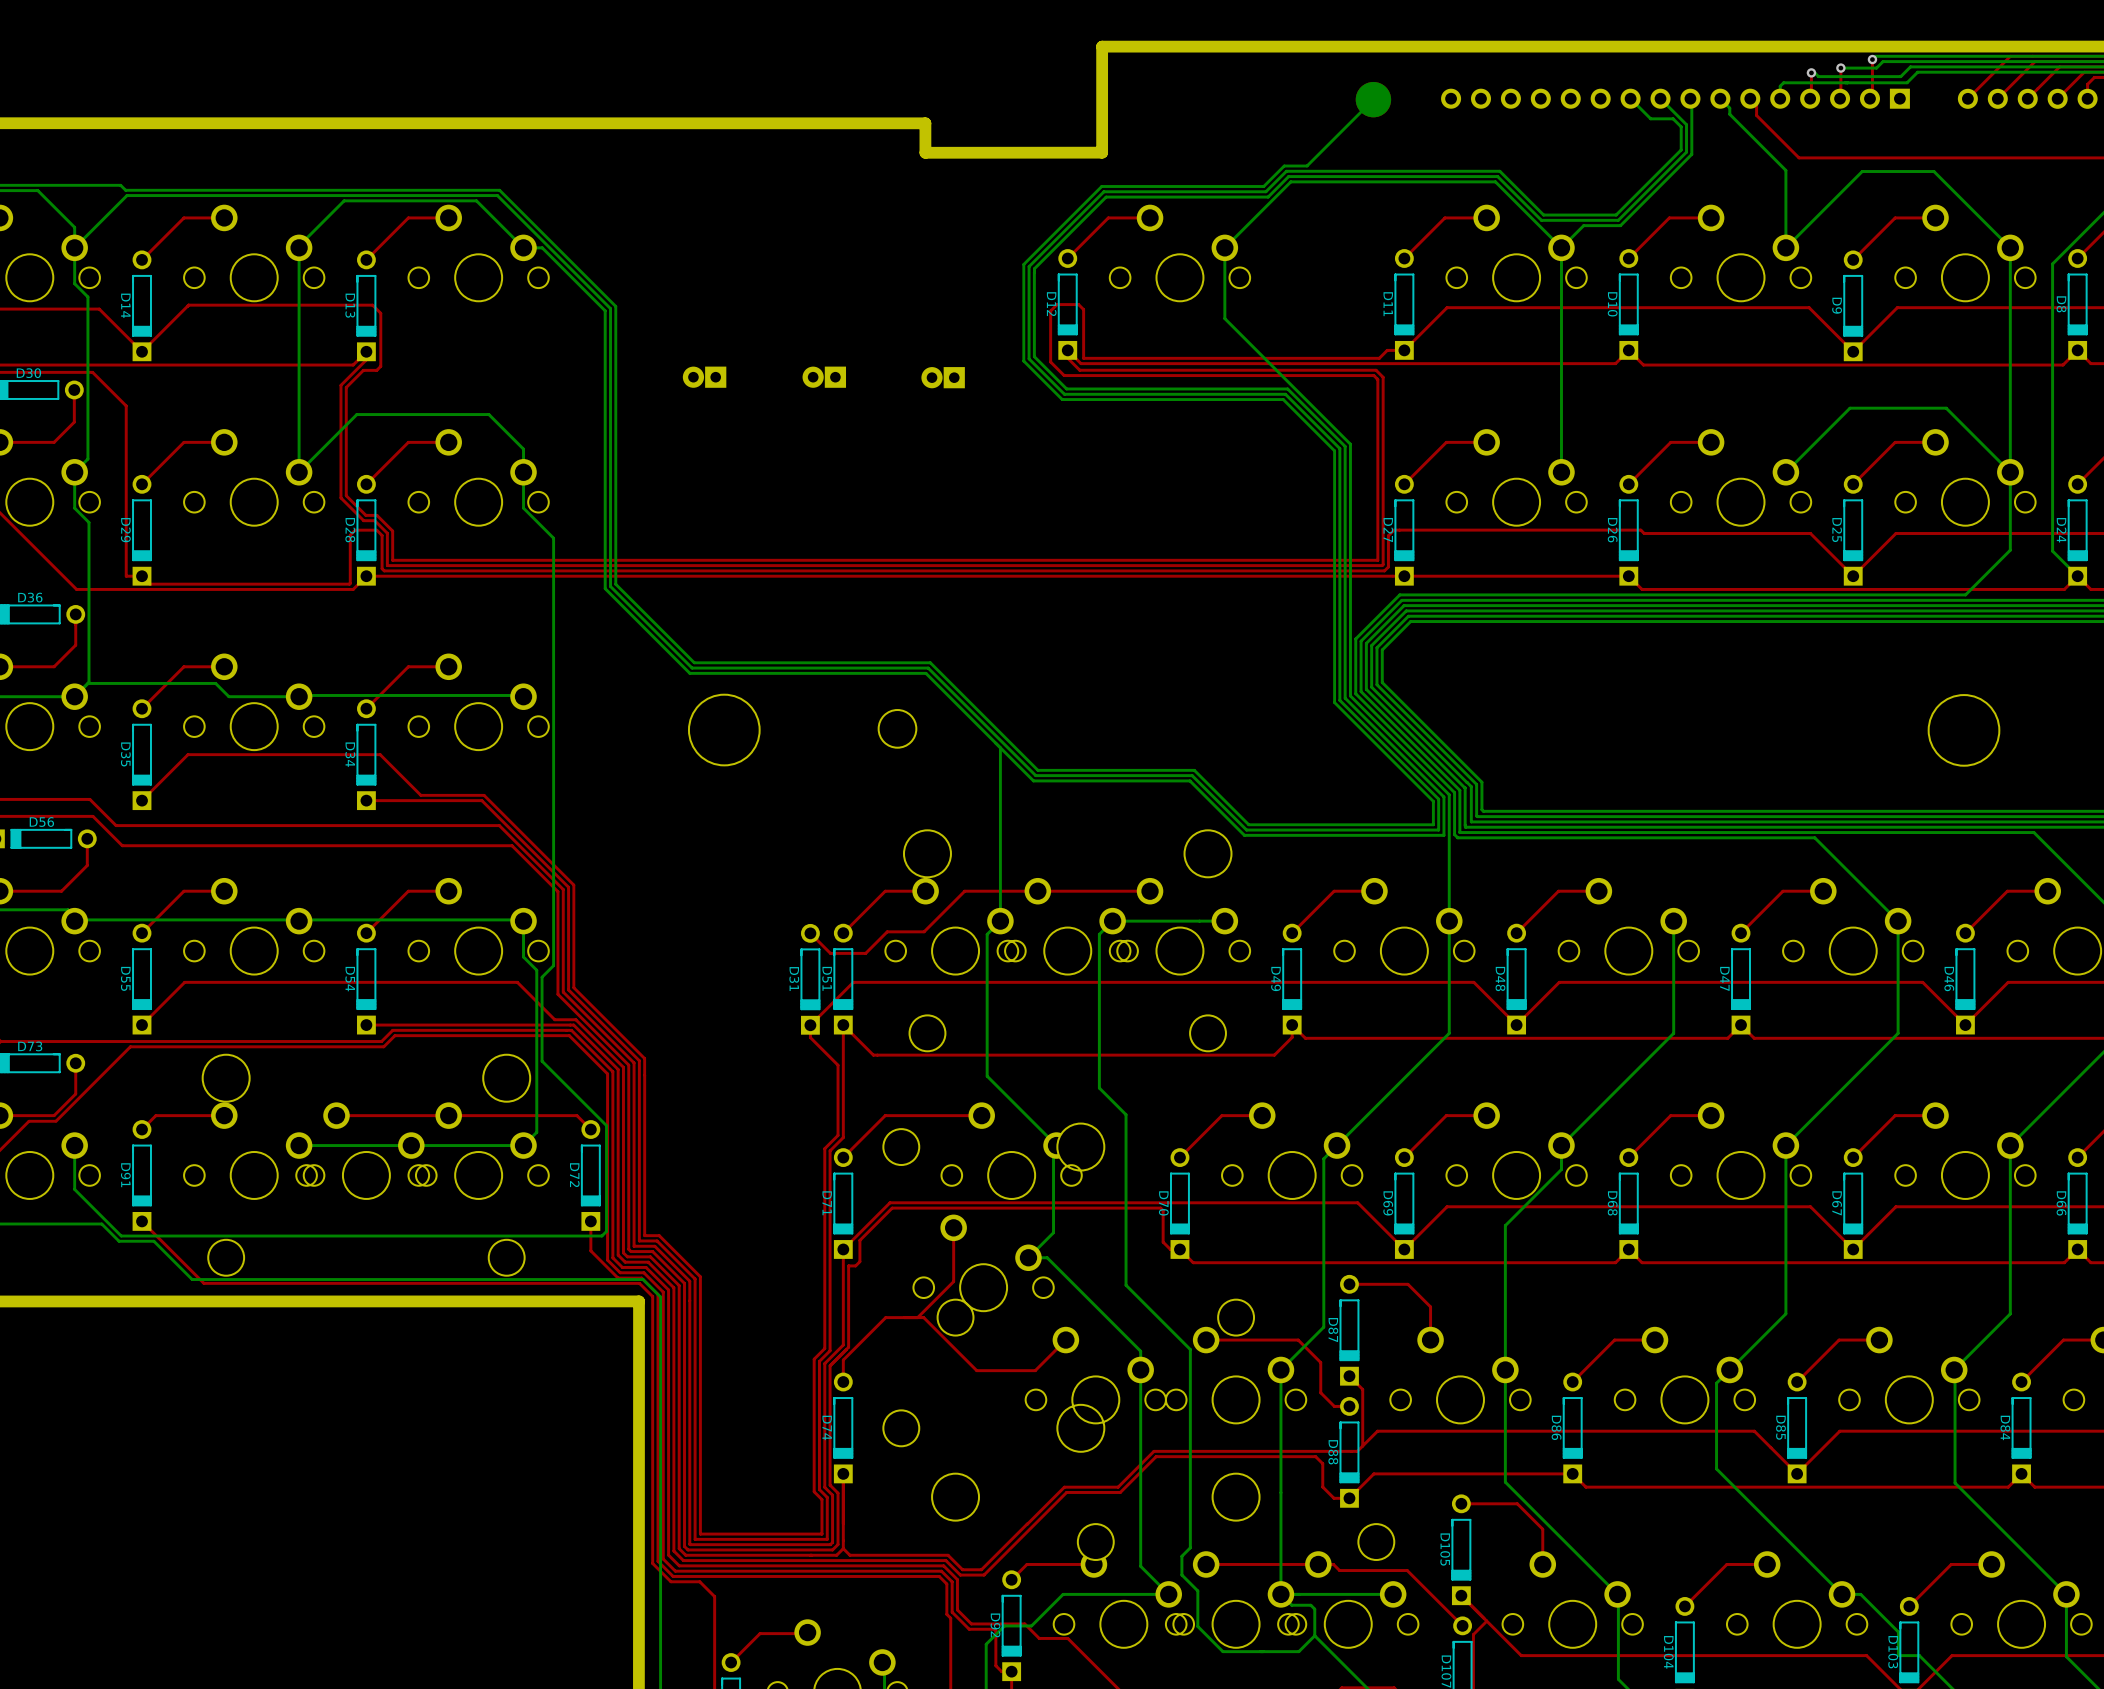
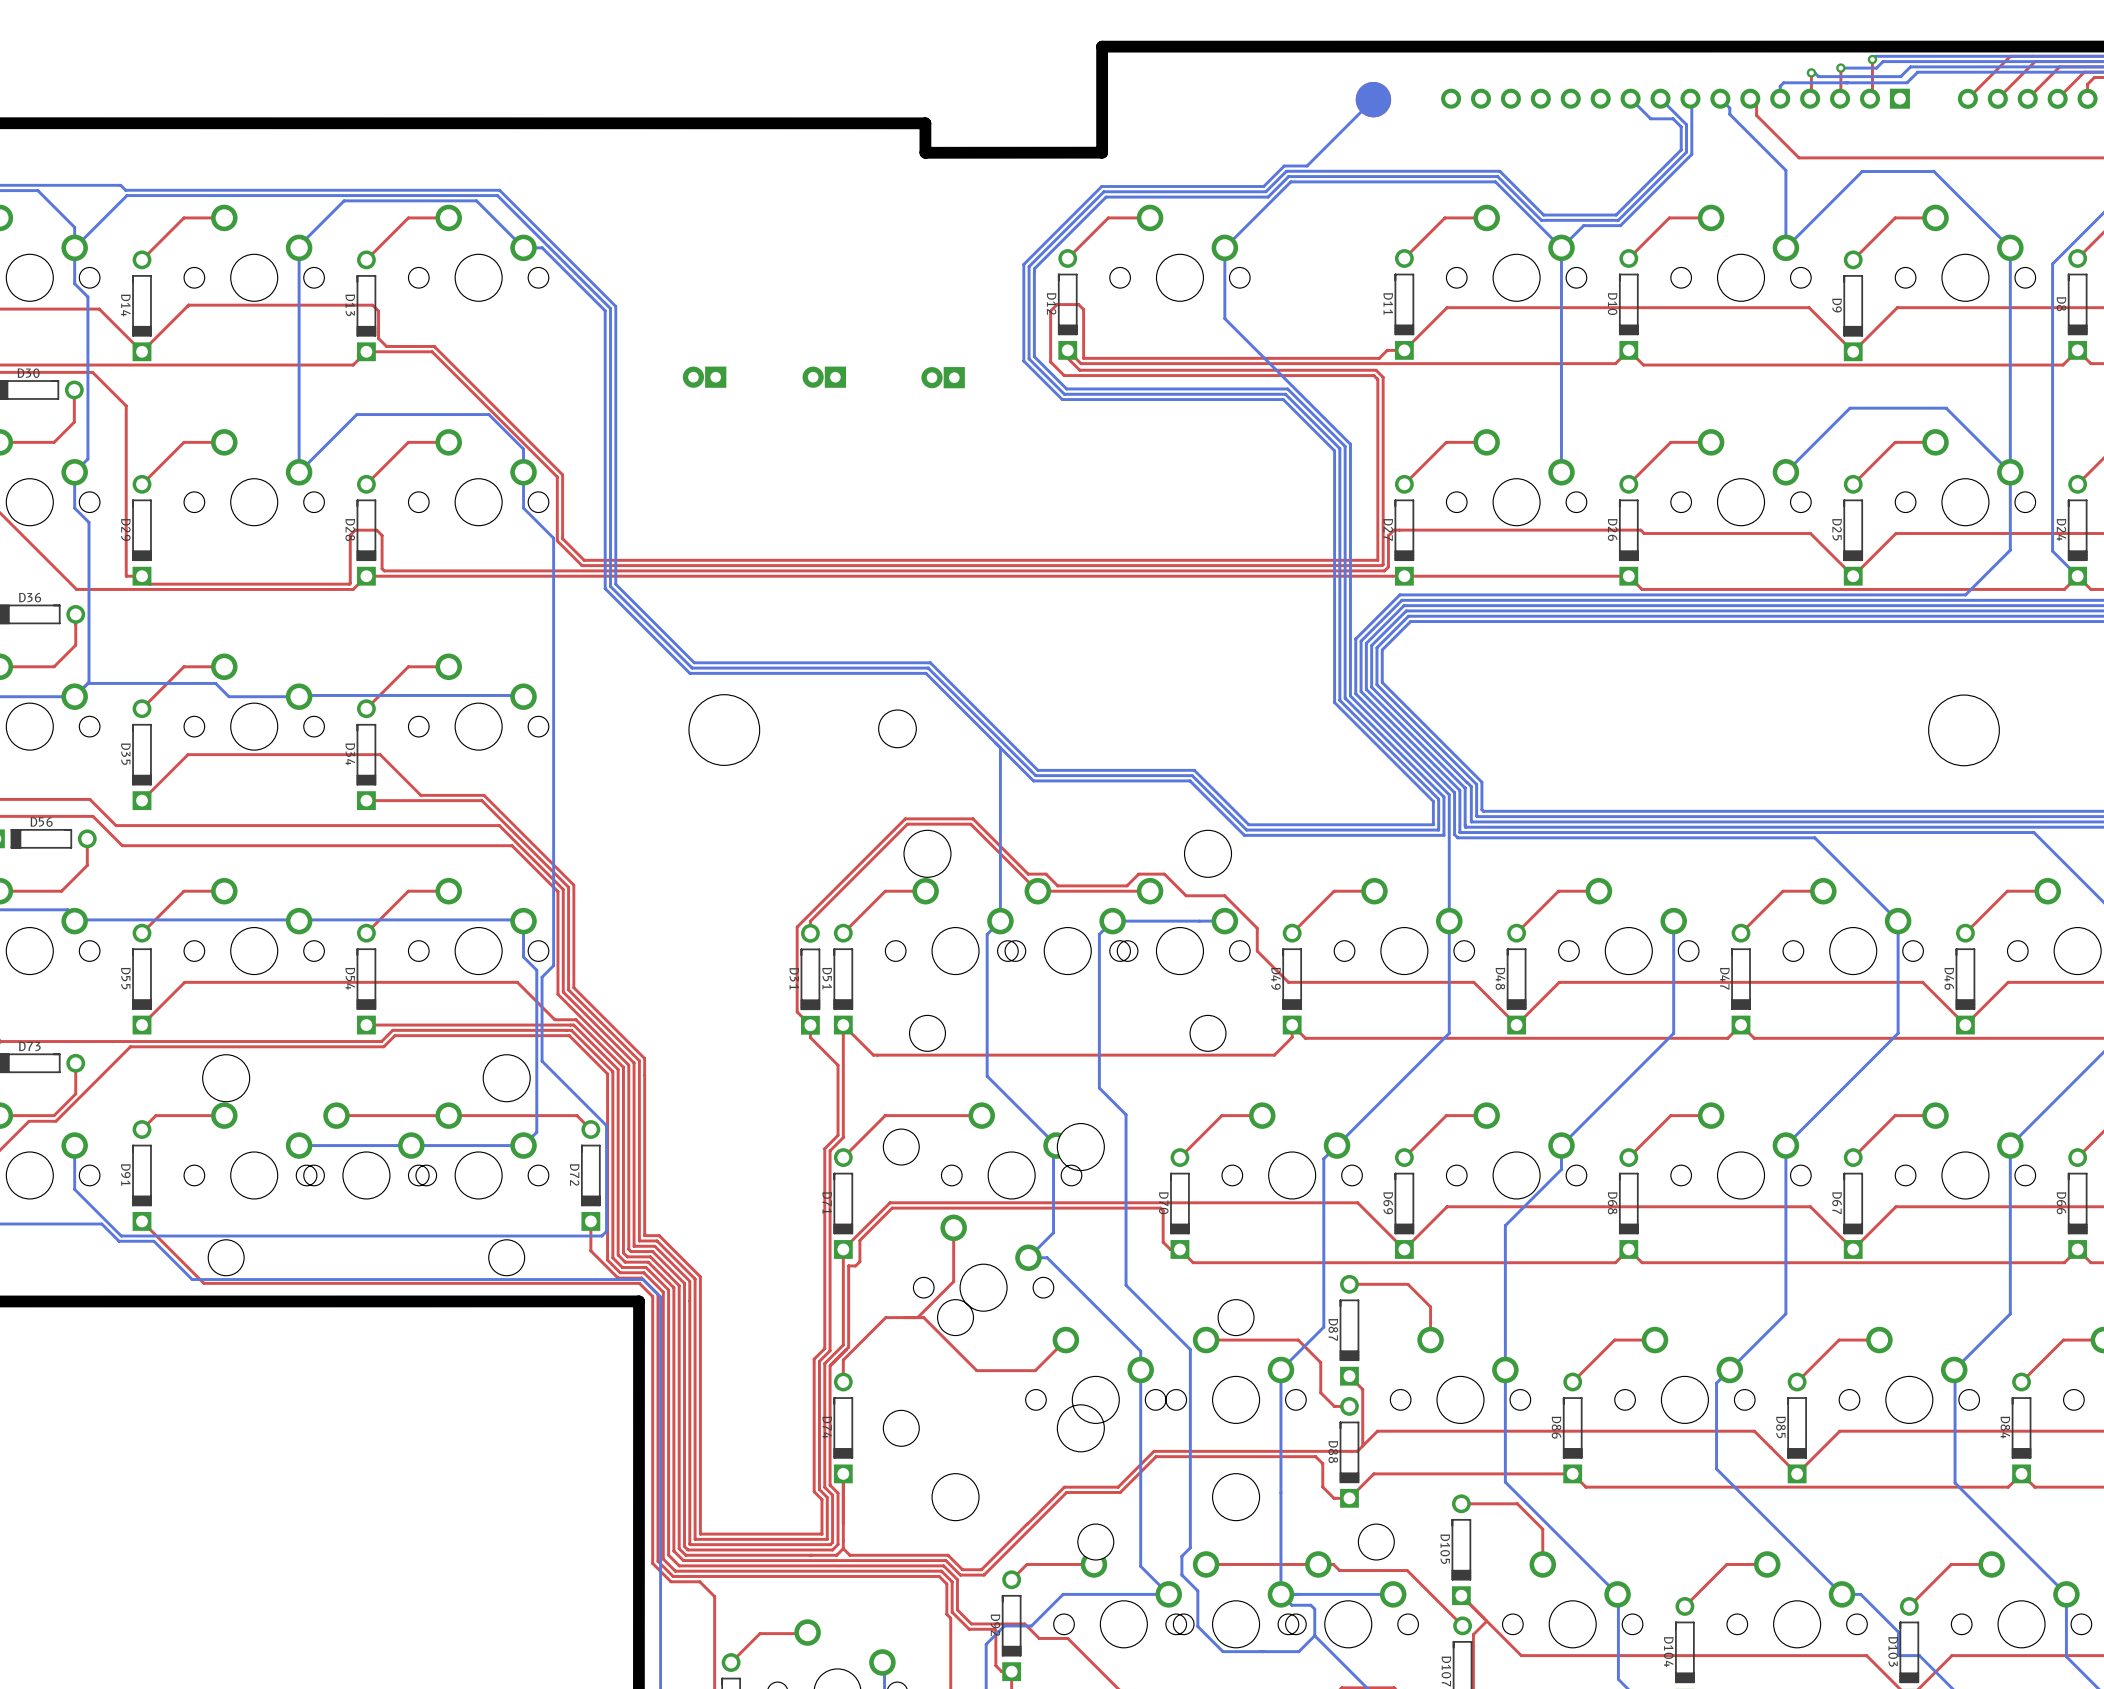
top track: (378, 311) (380, 313) (380, 366) (376, 370) (363, 370) (346, 387) (346, 495) (365, 515) (376, 515) (392, 531) (392, 560) (584, 560) -> (378, 311) (378, 338) (386, 346) (434, 346) (562, 474) (562, 538) (584, 560)
top track: (366, 351) (366, 359) (340, 385) (340, 497) (363, 520) (374, 520) (387, 533) (387, 565) -> (366, 351) (432, 351) (557, 477) (557, 540) (582, 565)
top track: (582, 565) (387, 565) -> none
top track: (1037, 891) (964, 891) (924, 931) (887, 931) (865, 953) (830, 953) (810, 933) -> (1037, 891) (970, 824) (907, 824) (810, 921) (810, 933)
top track: (1288, 982) (853, 982) (810, 1025) -> (1288, 982) (1257, 951) (1257, 928) (1224, 895) (1186, 895) (1164, 874) (1138, 874) (1126, 885) (1057, 885) (1046, 874) (1028, 874) (972, 818) (905, 818) (797, 927) (797, 1012) (810, 1025)

